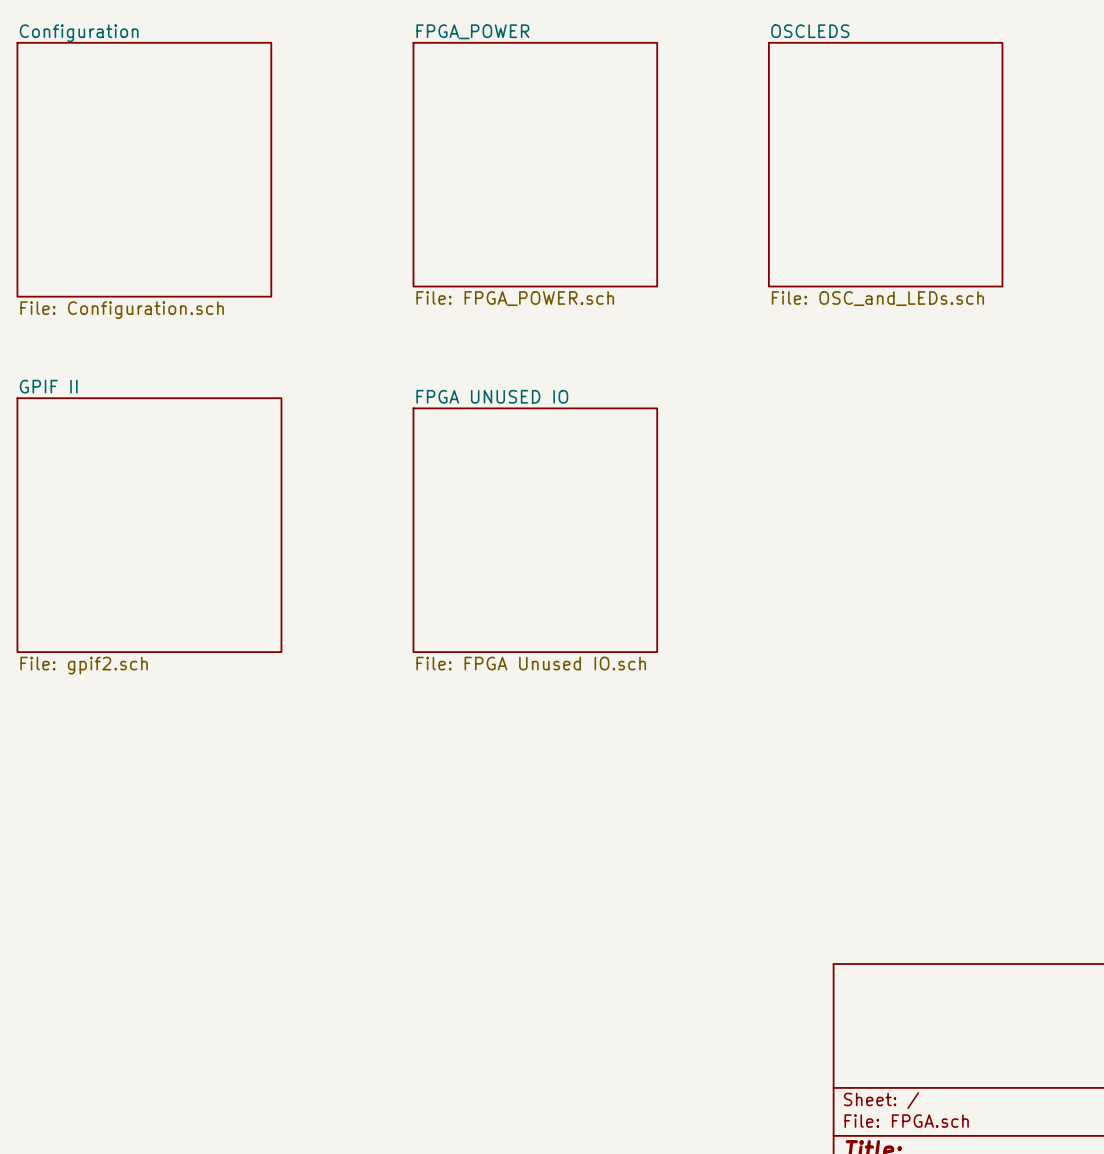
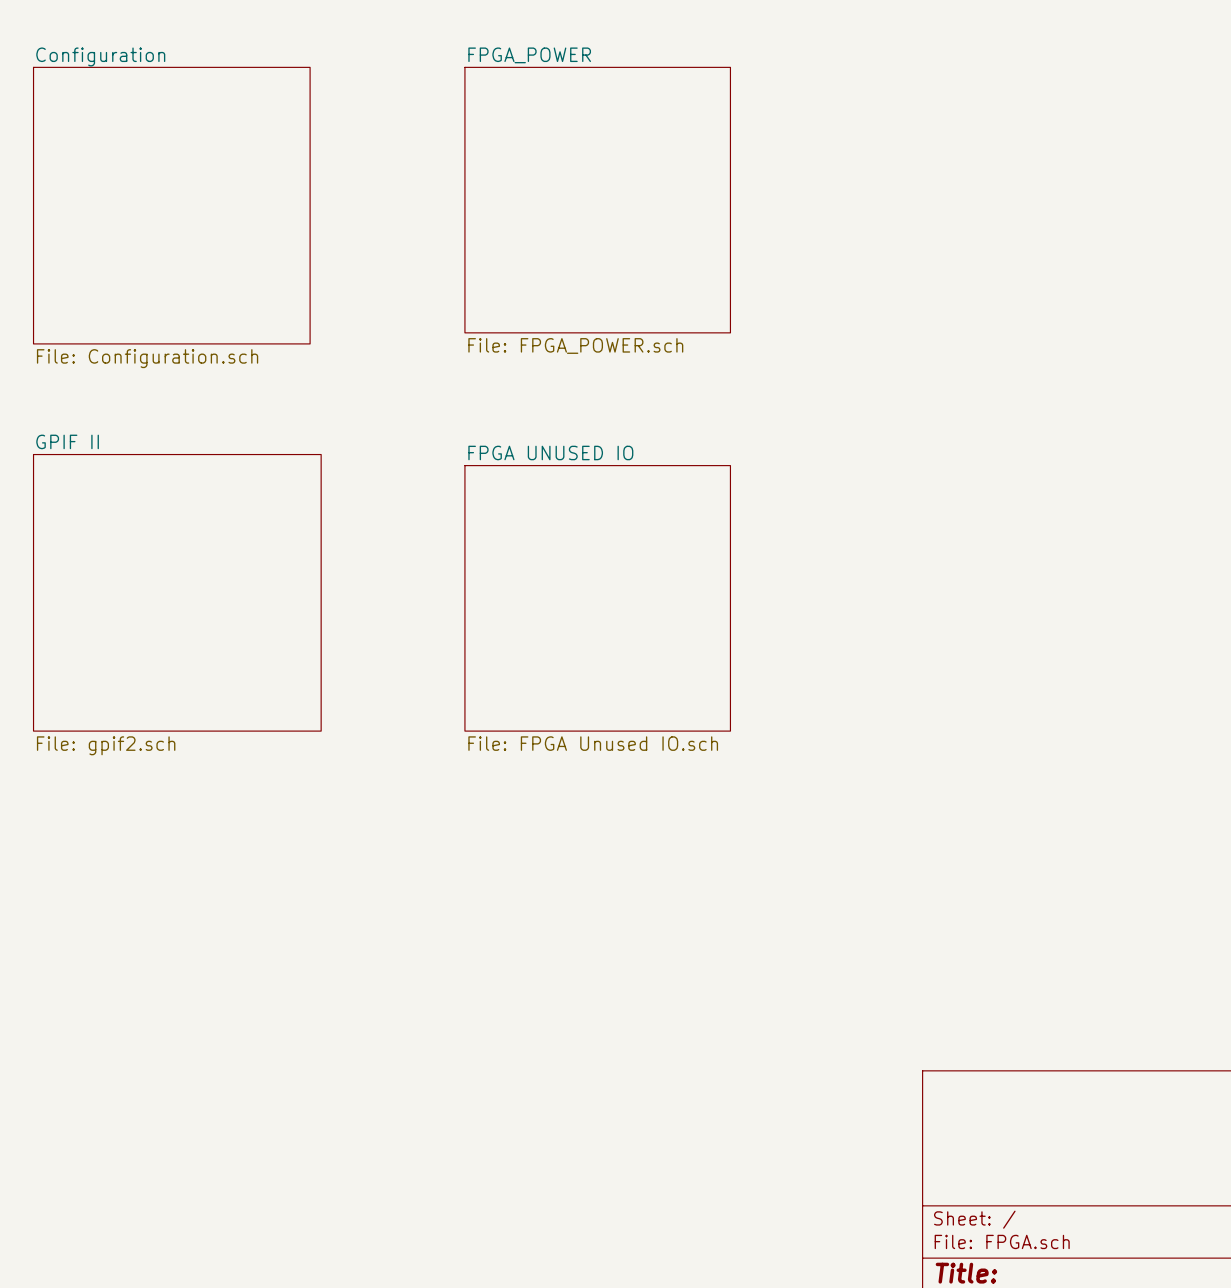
sheet OSCLEDS: File: OSC_and_LEDs.sch (885, 164) -> none

